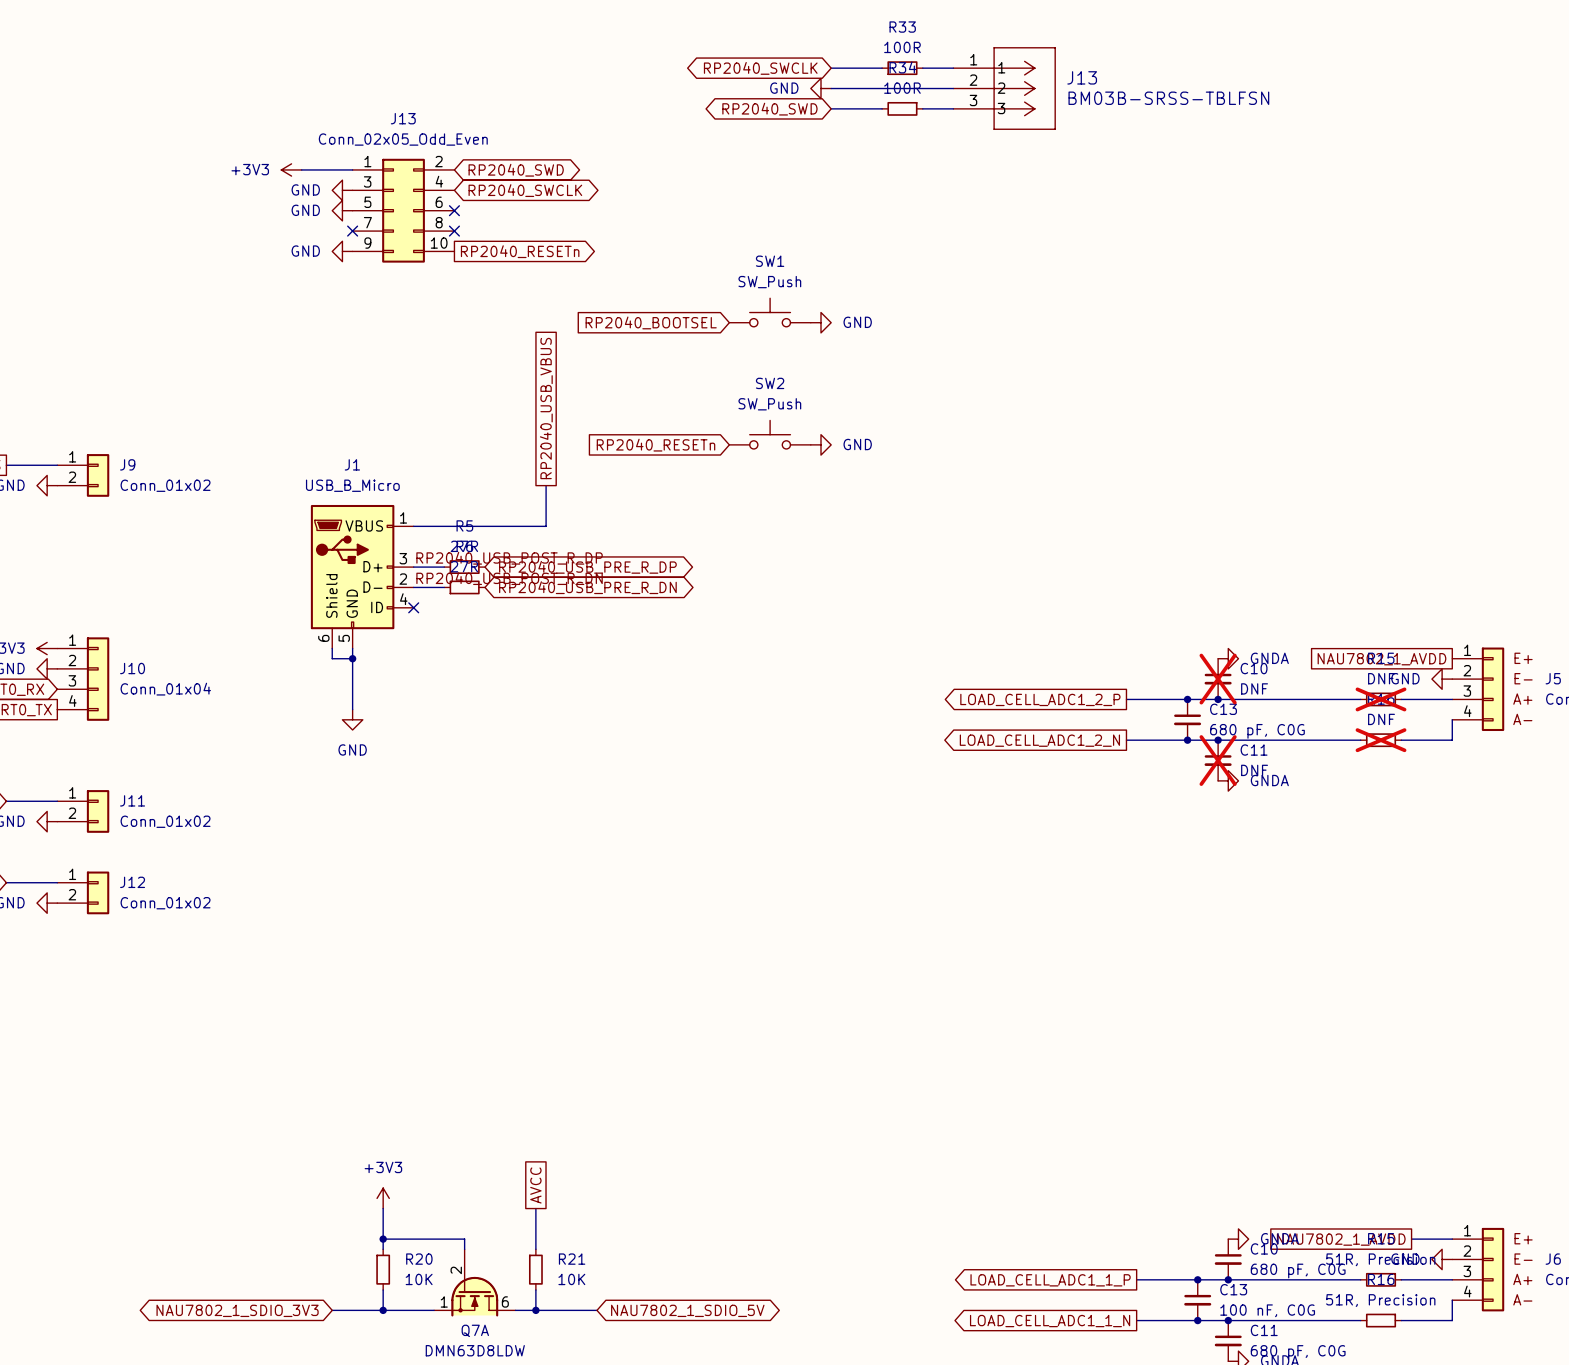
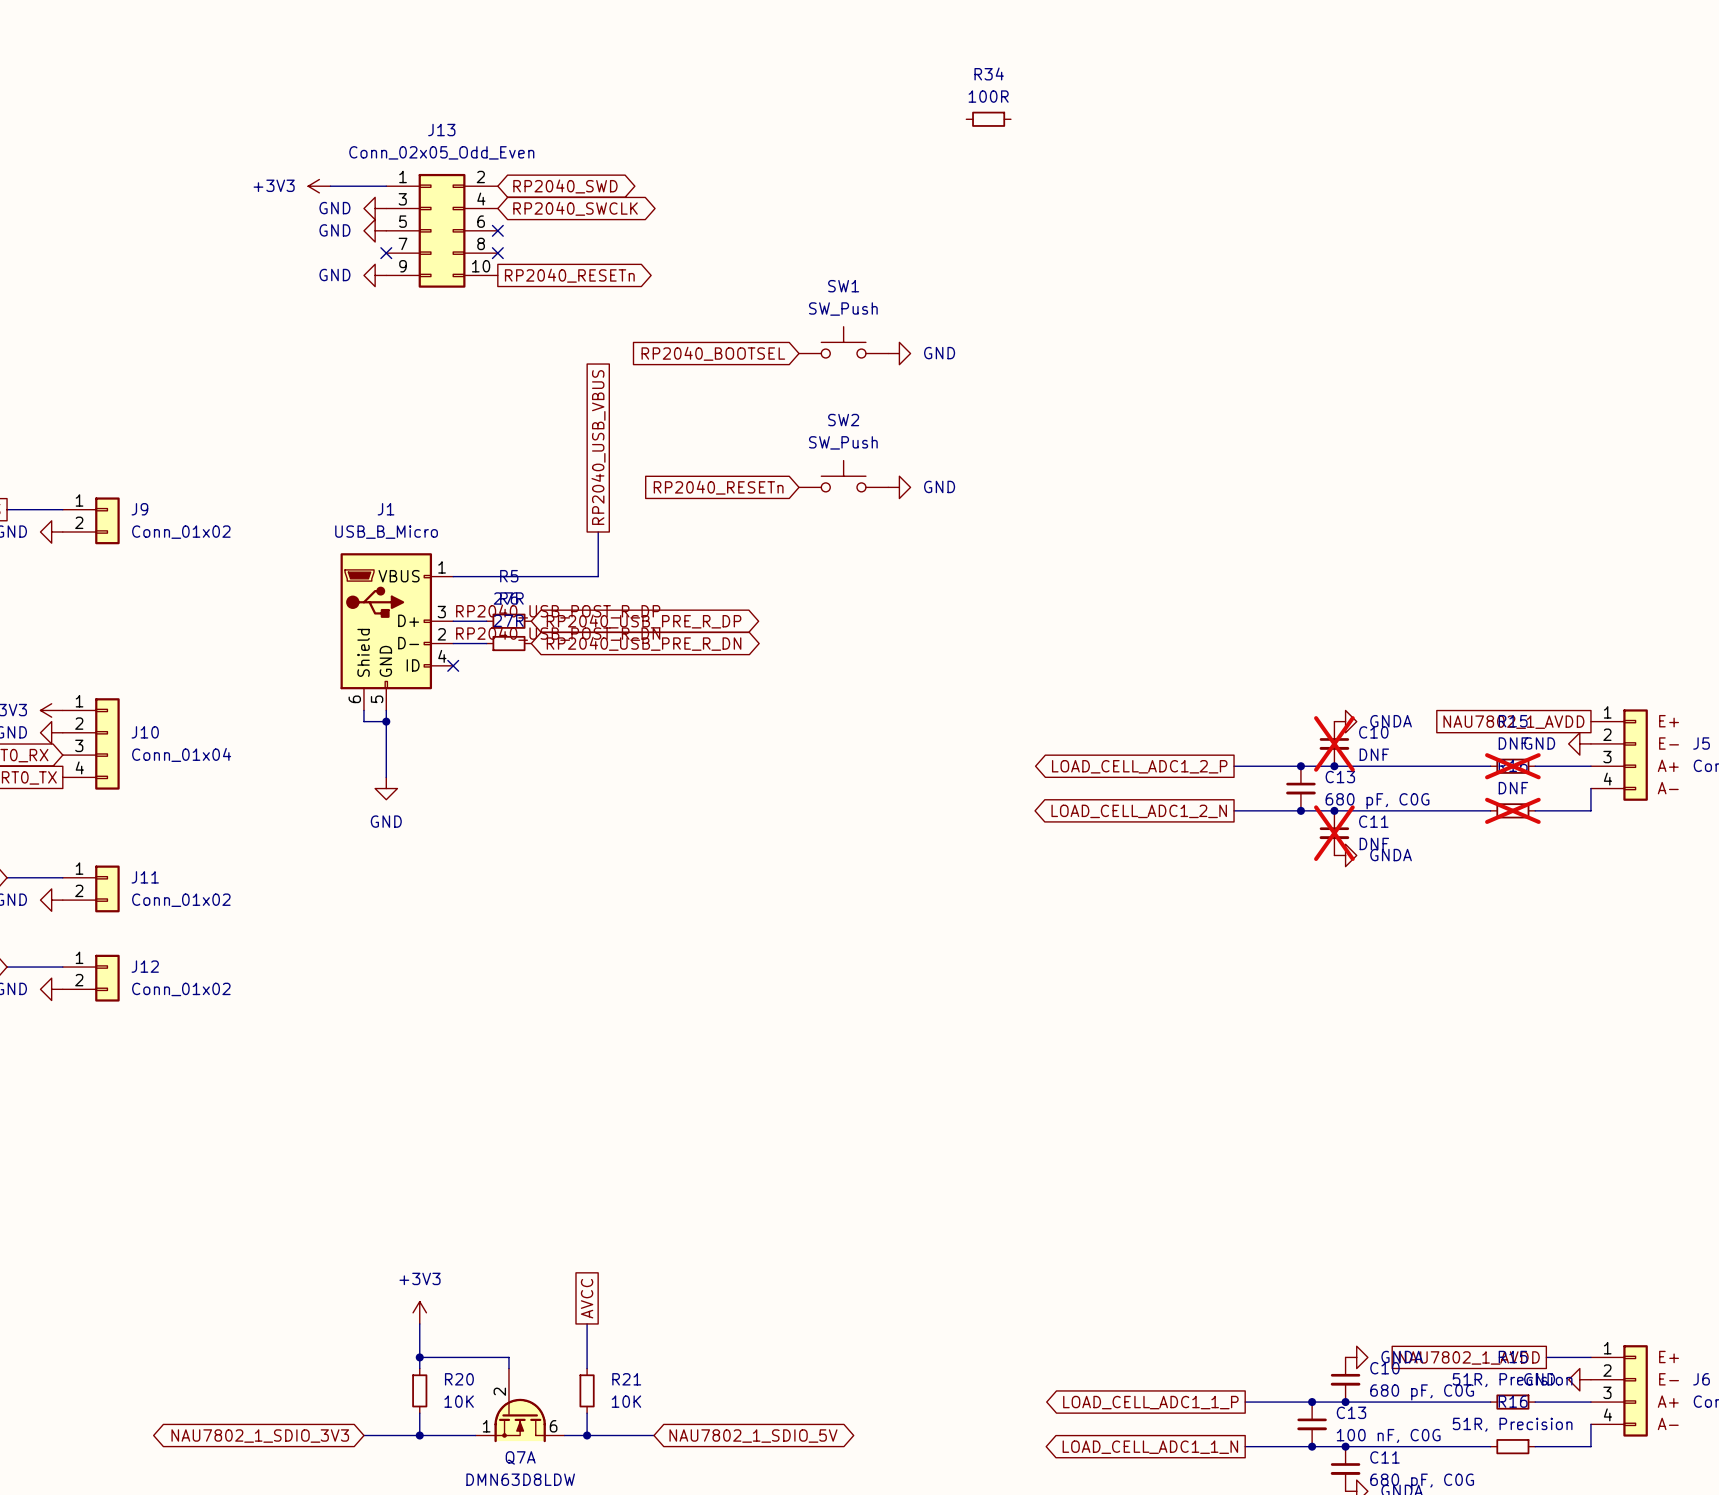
global label: RP2040_SWCLK (760, 68) -> none
wire: (831, 68) (882, 68) -> none
R33: 100R (902, 68) -> none
wire: (922, 68) (953, 68) -> none
power symbol: GND (821, 88) -> none
wire: (831, 88) (953, 88) -> none
J13: BM03B-SRSS-TBLFSN (1004, 88) -> none
wire: (831, 108) (882, 108) -> none
wire: (922, 108) (953, 108) -> none
global label: RP2040_SWD (769, 109) -> none

